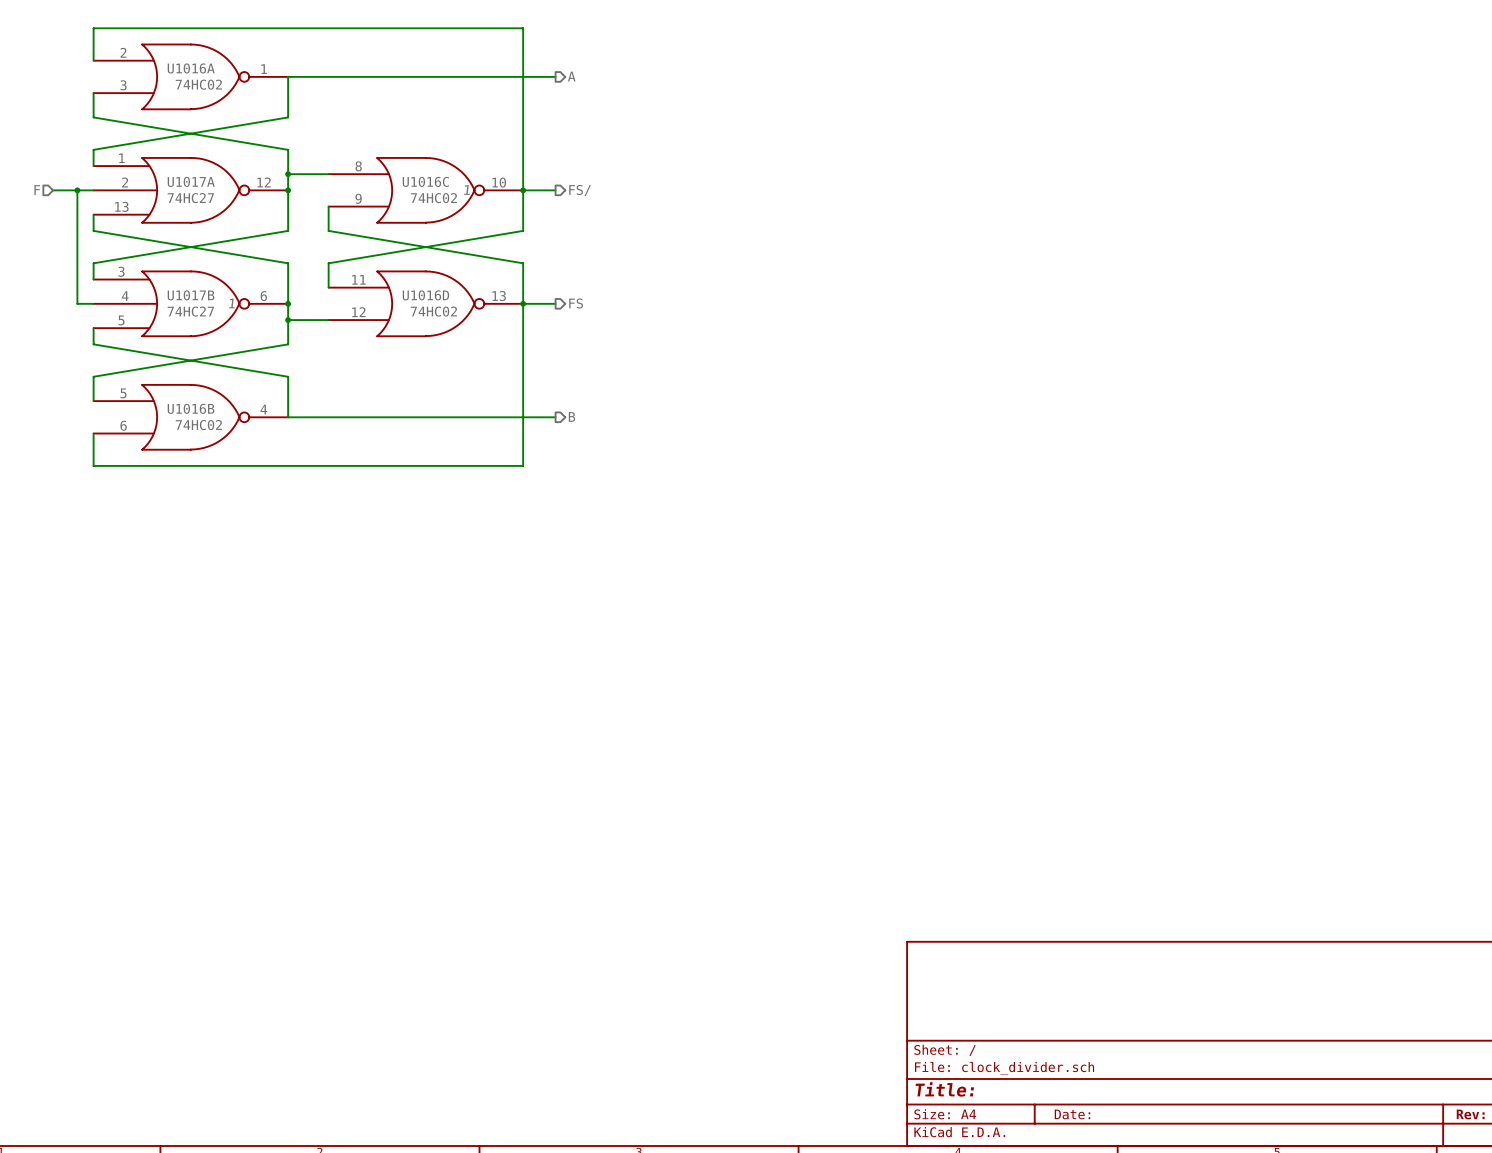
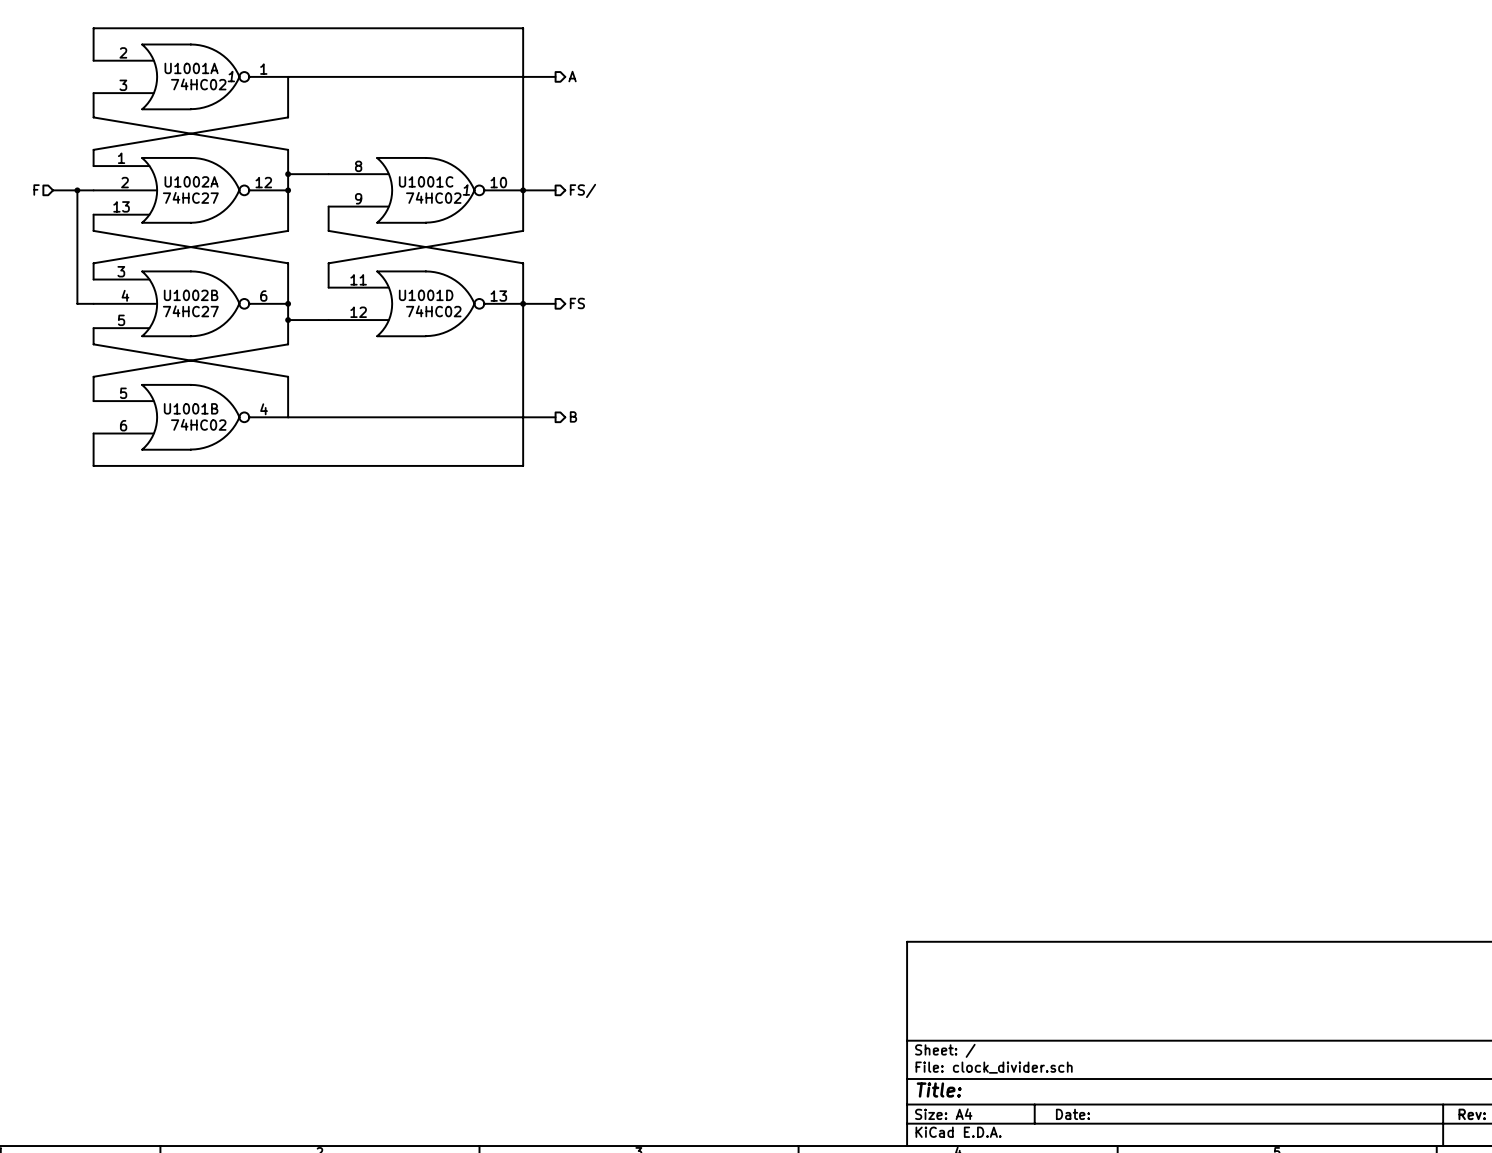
U1016A name: U1016A (191, 68) -> U1001A (191, 68)
U1016A text: none -> 1 (231, 76)
U1017A name: U1017A (191, 181) -> U1002A (191, 181)
U1016C name: U1016C (425, 181) -> U1001C (426, 181)
U1017B name: U1017B (191, 295) -> U1002B (191, 295)
U1016D name: U1016D (425, 295) -> U1001D (426, 295)
U1017B text: 1 (231, 303) -> none
U1016B name: U1016B (191, 408) -> U1001B (191, 408)

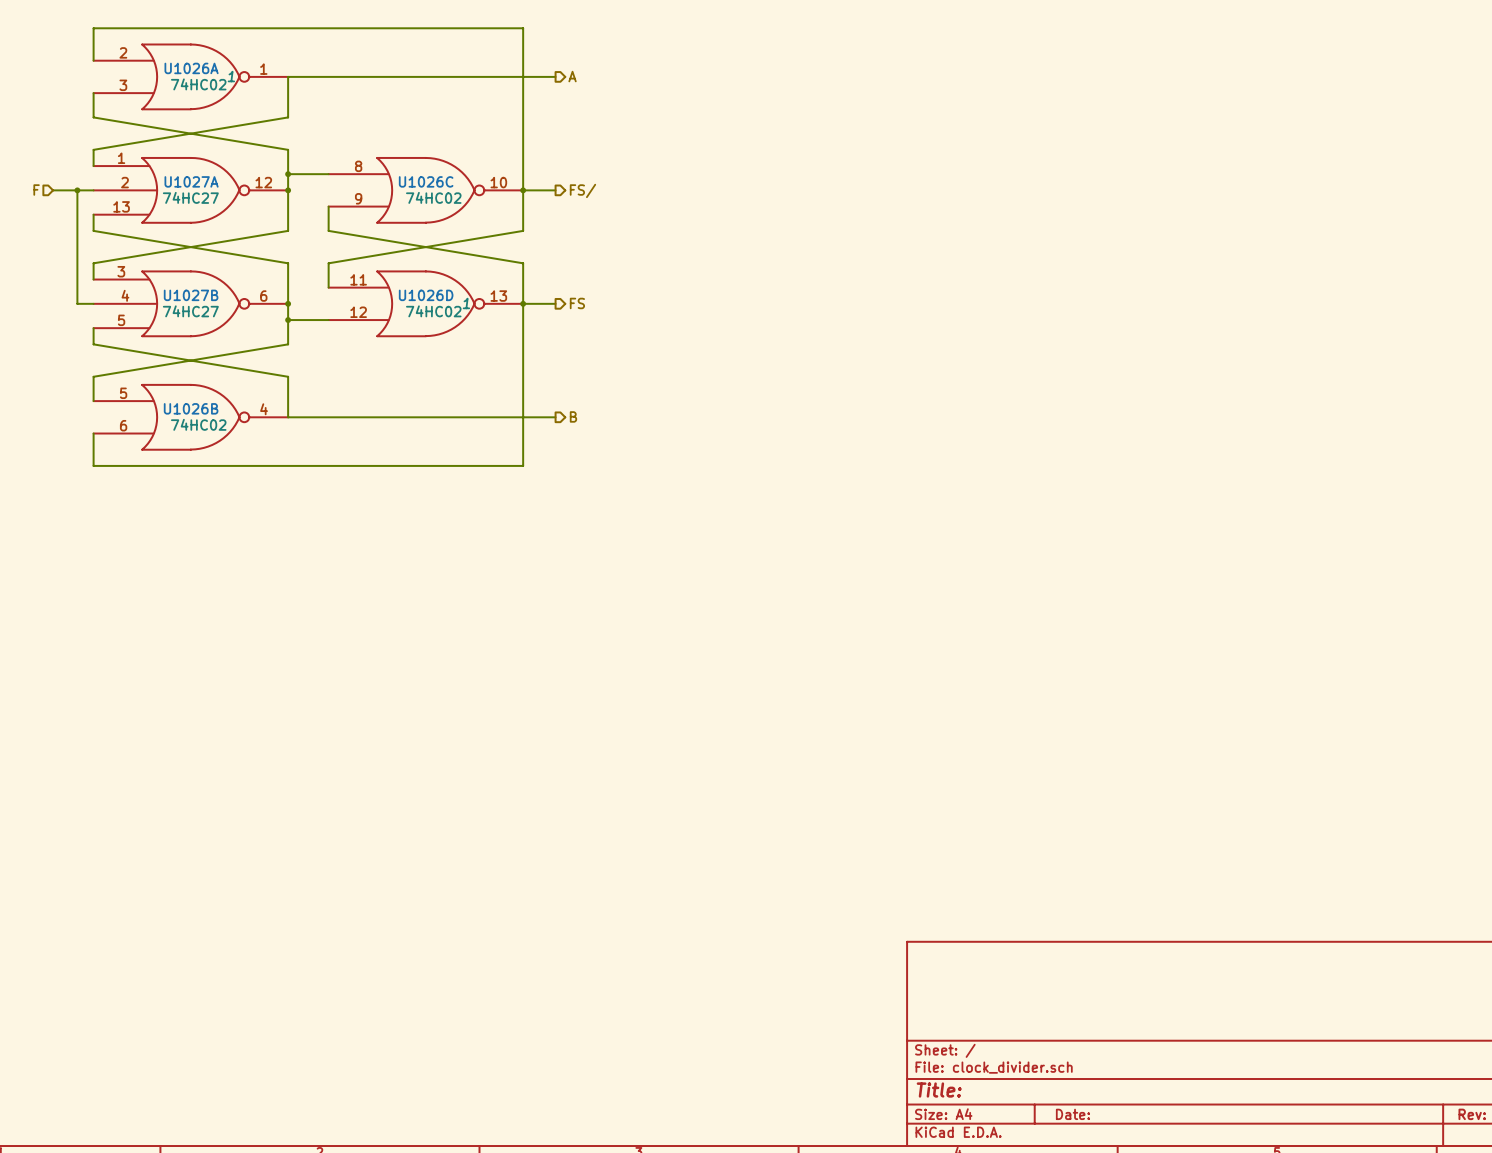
U1001A name: U1001A (191, 68) -> U1026A (191, 68)
U1002A name: U1002A (191, 181) -> U1027A (191, 181)
U1001C name: U1001C (426, 181) -> U1026C (426, 181)
U1001C text: 1 (466, 190) -> none
U1002B name: U1002B (191, 295) -> U1027B (191, 295)
U1001D name: U1001D (426, 295) -> U1026D (426, 295)
U1001D text: none -> 1 (466, 303)
U1001B name: U1001B (191, 408) -> U1026B (191, 408)

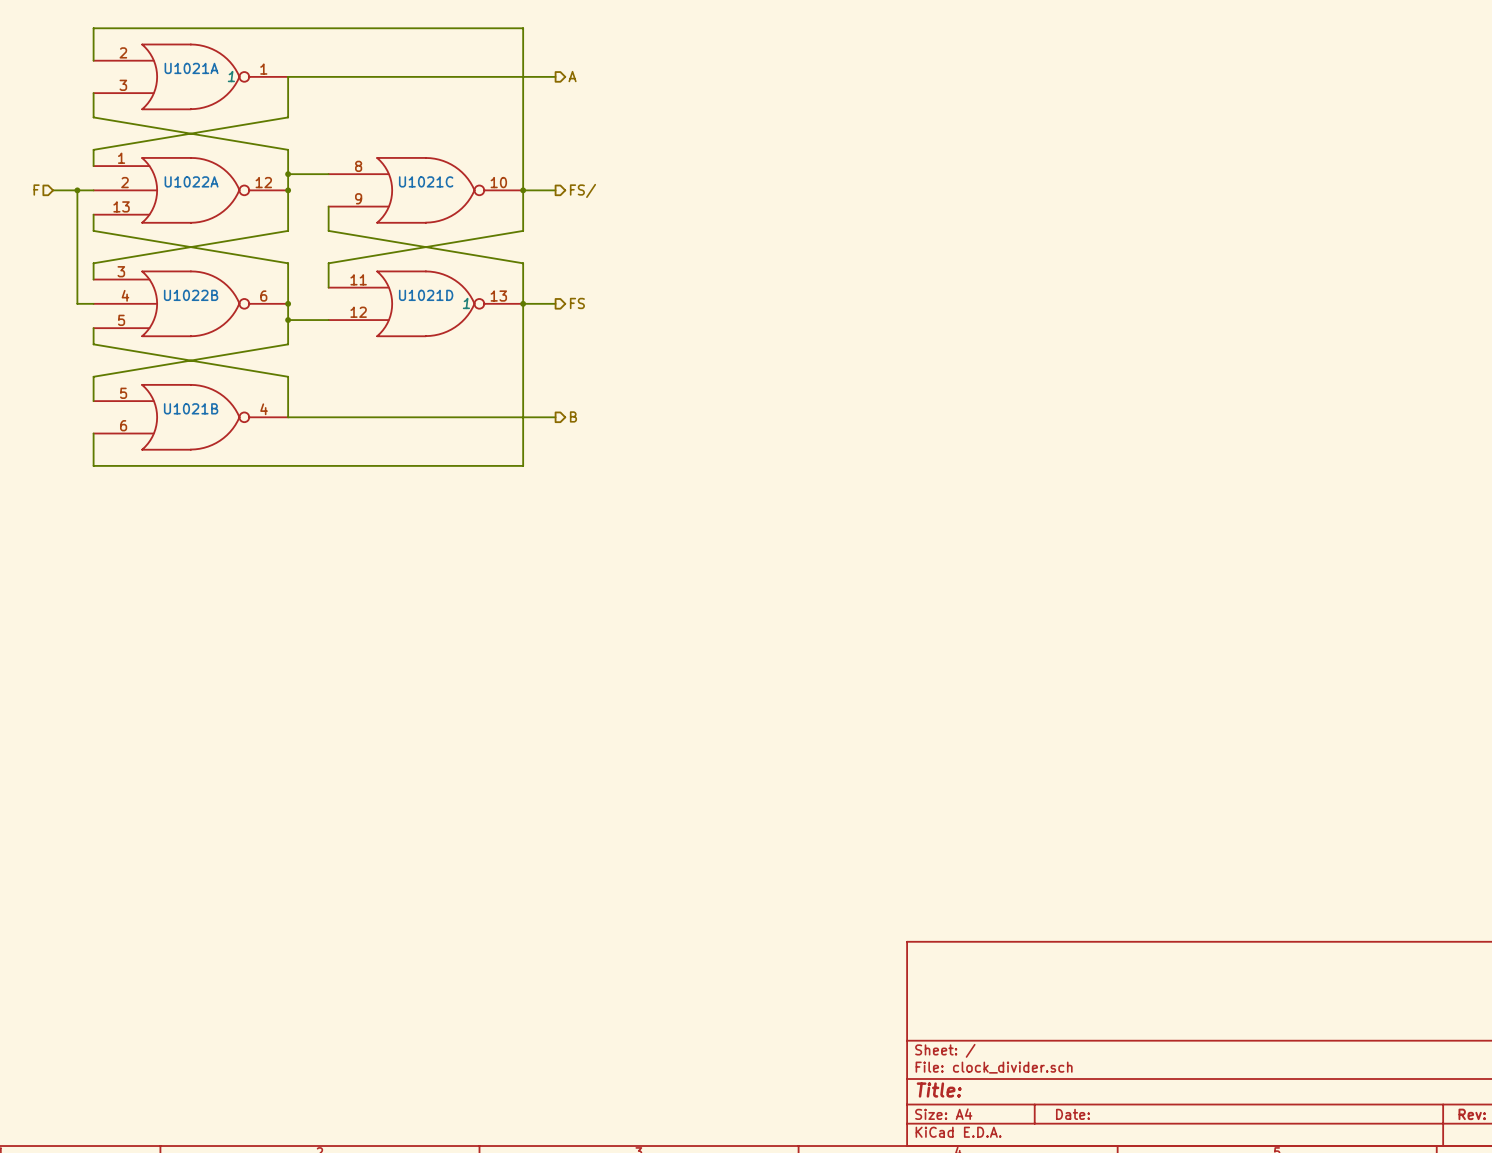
U1026A name: U1026A (191, 68) -> U1021A (191, 68)
U1026A value: 74HC02 (198, 84) -> none
U1027A name: U1027A (191, 181) -> U1022A (191, 181)
U1026C name: U1026C (426, 181) -> U1021C (426, 181)
U1027A value: 74HC27 (190, 197) -> none
U1026C value: 74HC02 (433, 197) -> none
U1027B name: U1027B (191, 295) -> U1022B (191, 295)
U1026D name: U1026D (426, 295) -> U1021D (426, 295)
U1027B value: 74HC27 (190, 311) -> none
U1026D value: 74HC02 (433, 311) -> none
U1026B name: U1026B (191, 408) -> U1021B (191, 408)
U1026B value: 74HC02 (198, 424) -> none

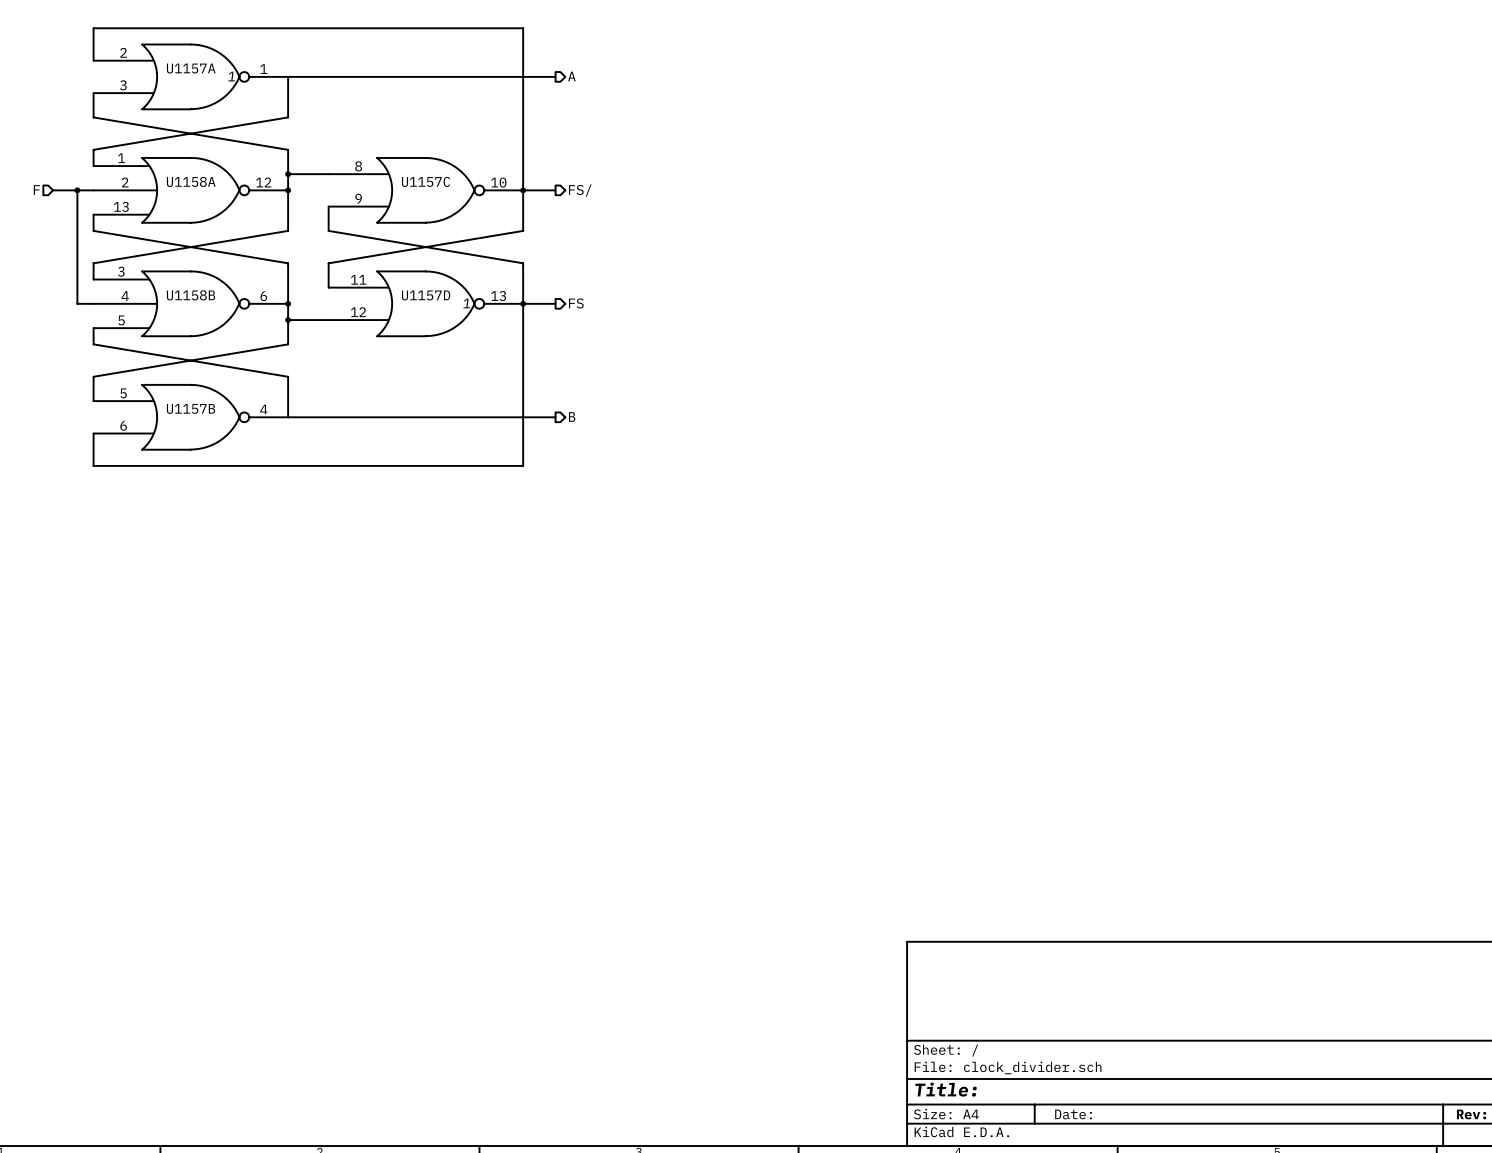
U1021A name: U1021A (191, 68) -> U1157A (191, 68)
U1022A name: U1022A (191, 181) -> U1158A (191, 181)
U1021C name: U1021C (426, 181) -> U1157C (426, 181)
U1022B name: U1022B (191, 295) -> U1158B (191, 295)
U1021D name: U1021D (426, 295) -> U1157D (426, 295)
U1021B name: U1021B (191, 408) -> U1157B (191, 408)

